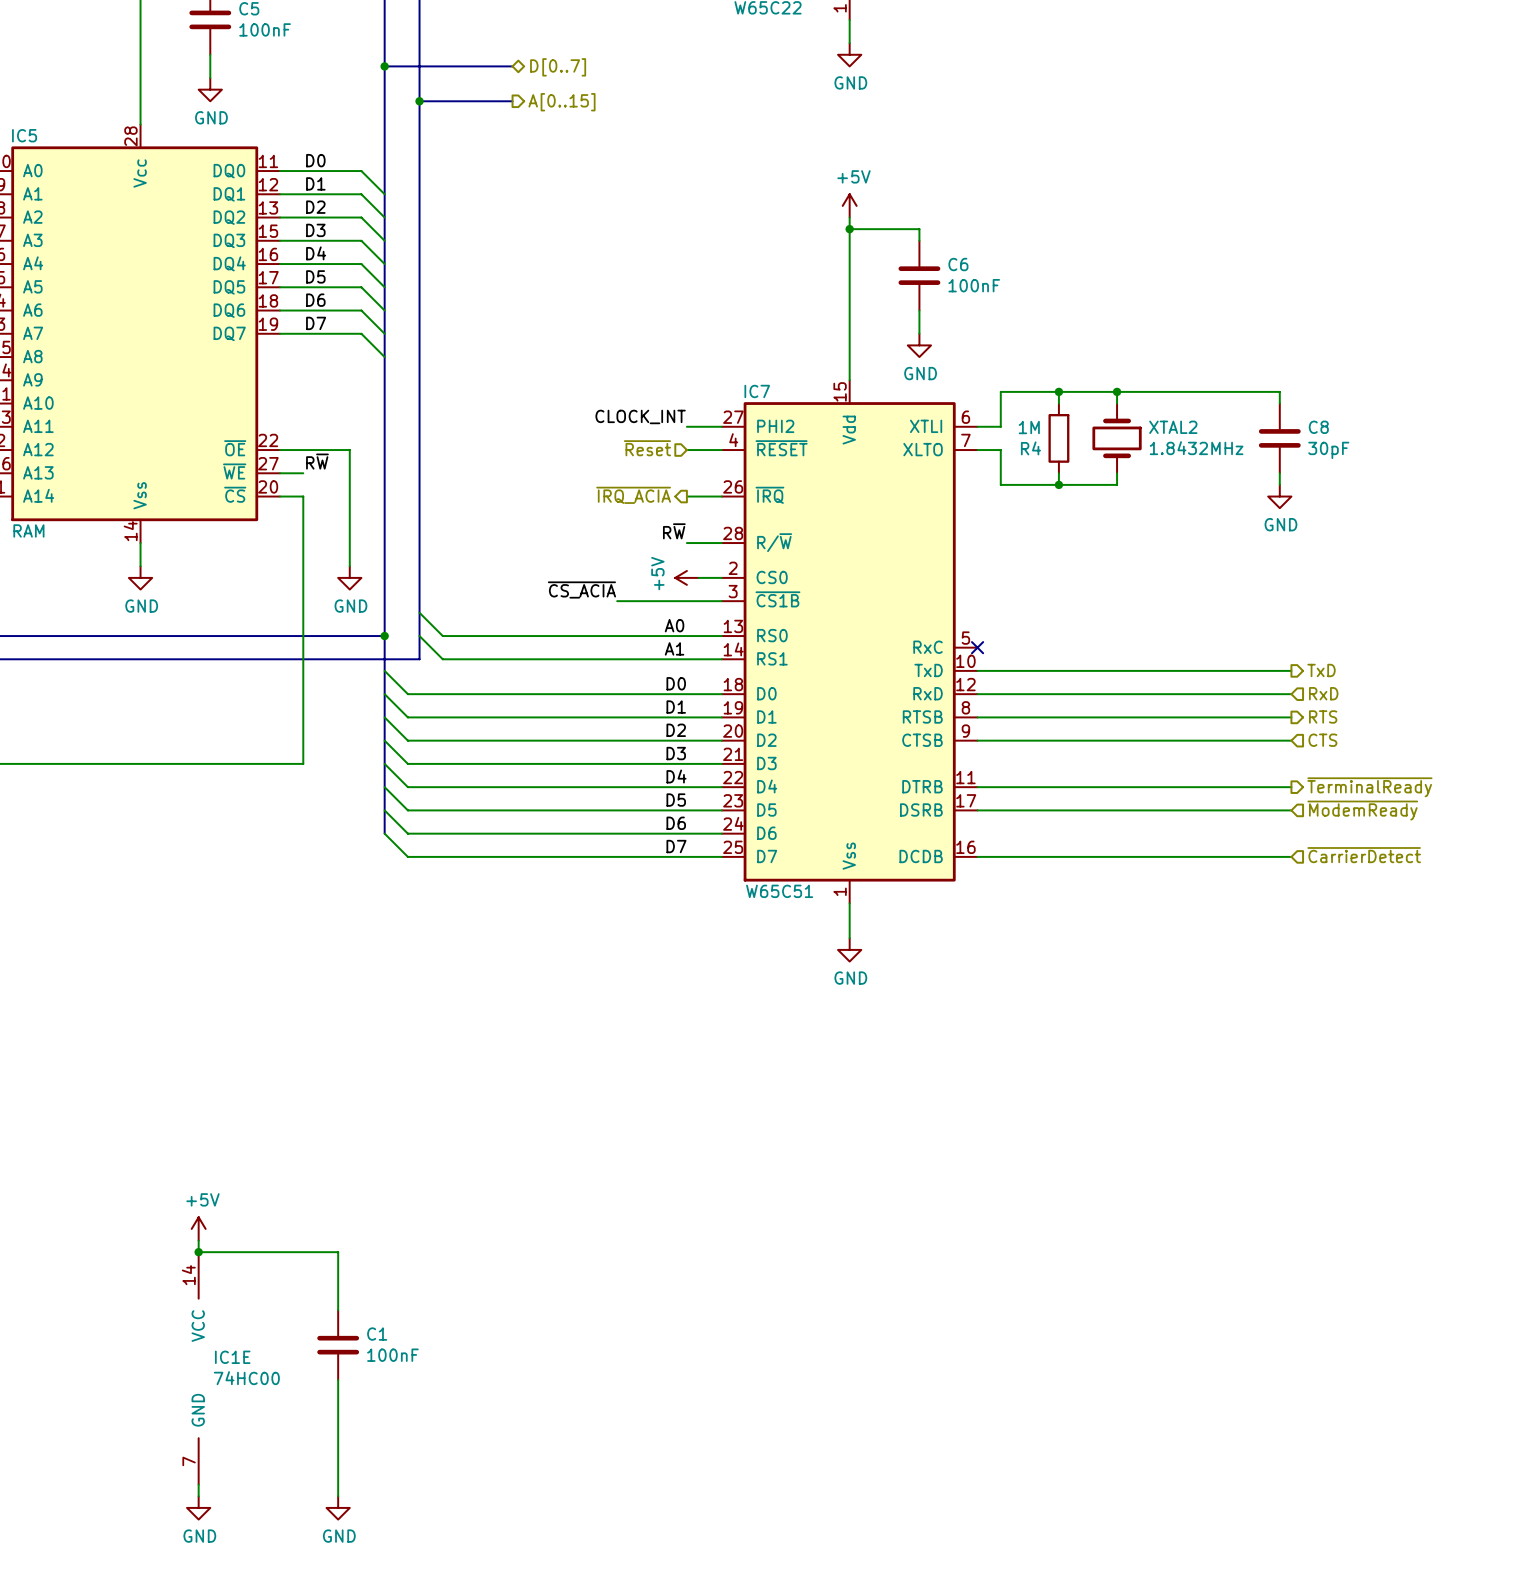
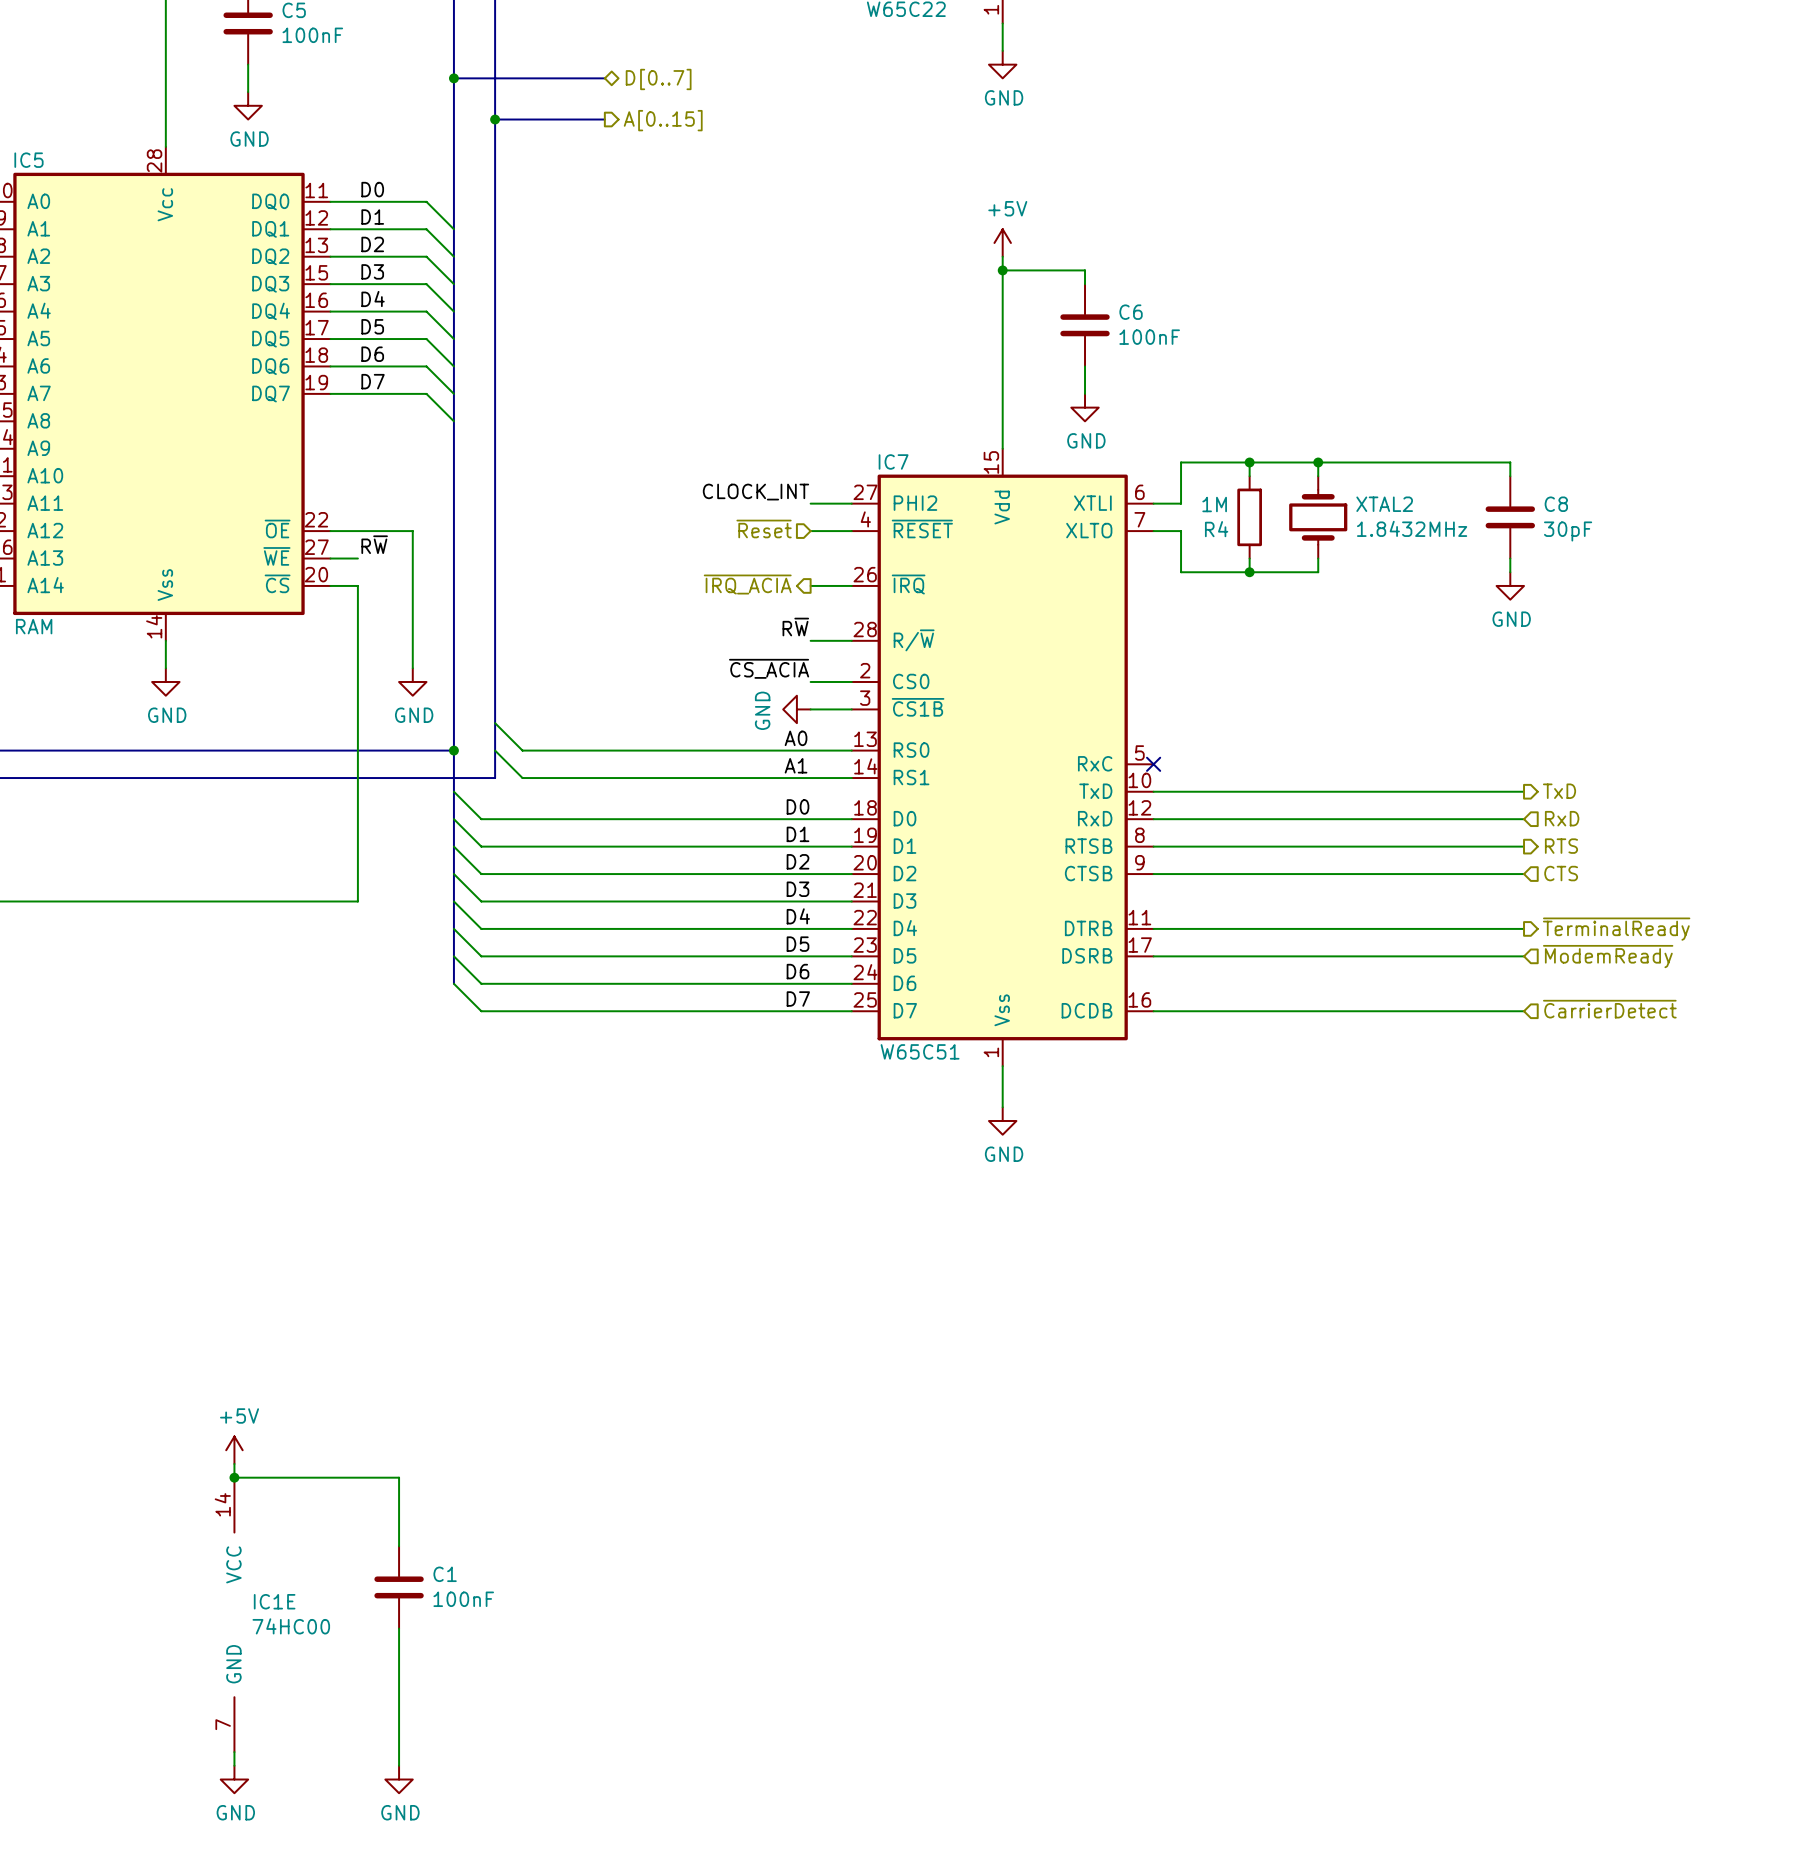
power symbol: +5V (686, 577) -> none
label position: ~{CS_ACIA} (581, 590) -> ~{CS_ACIA} (769, 668)
wire: (617, 601) (686, 601) -> none
power symbol: none -> GND (796, 709)

